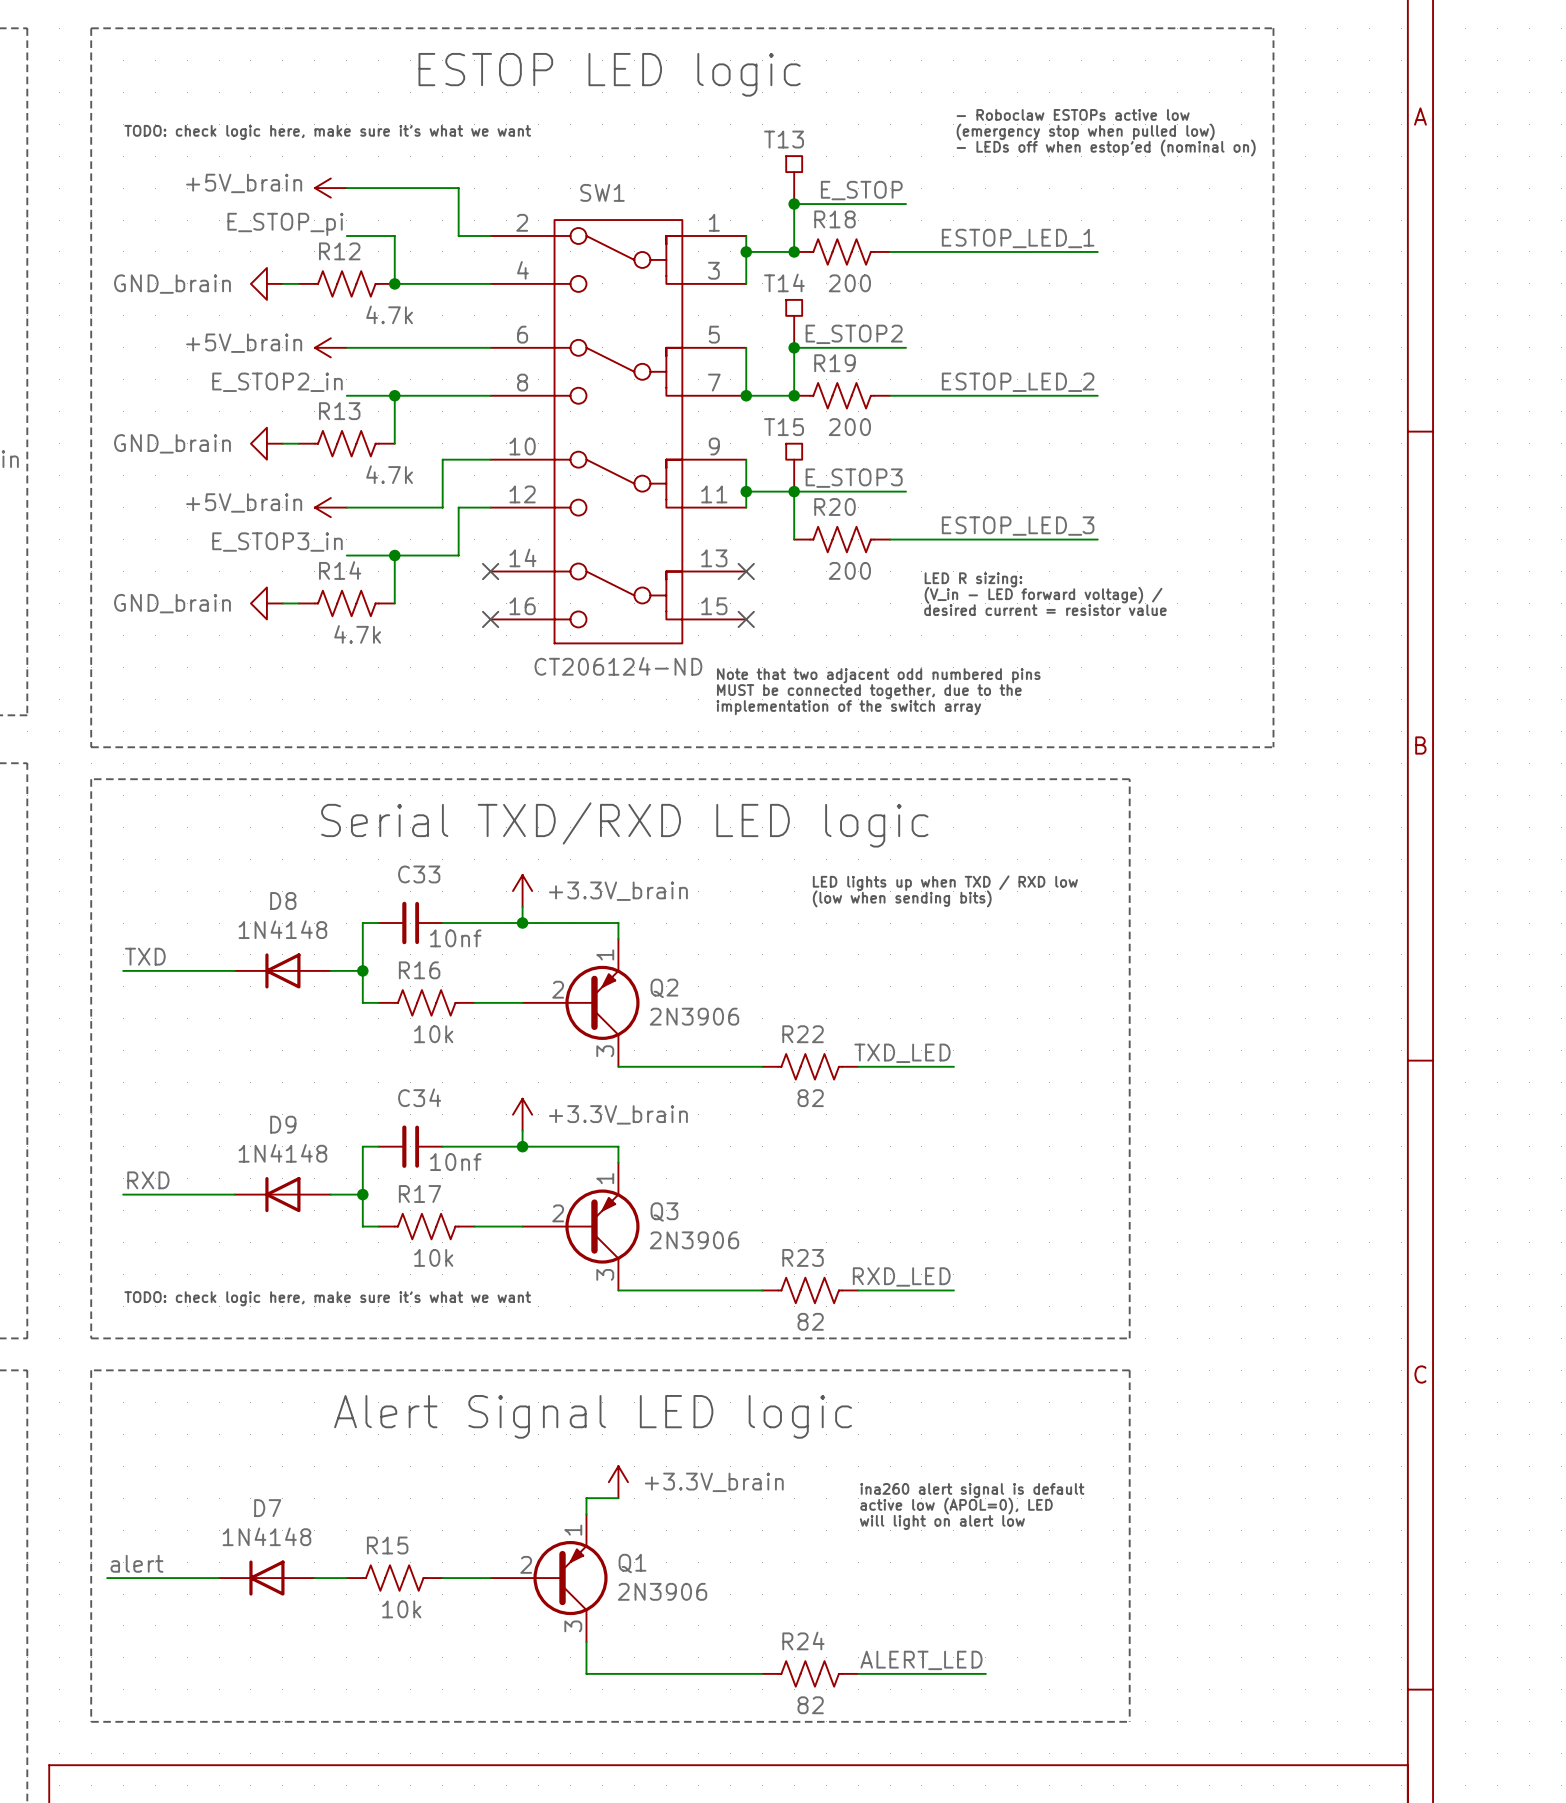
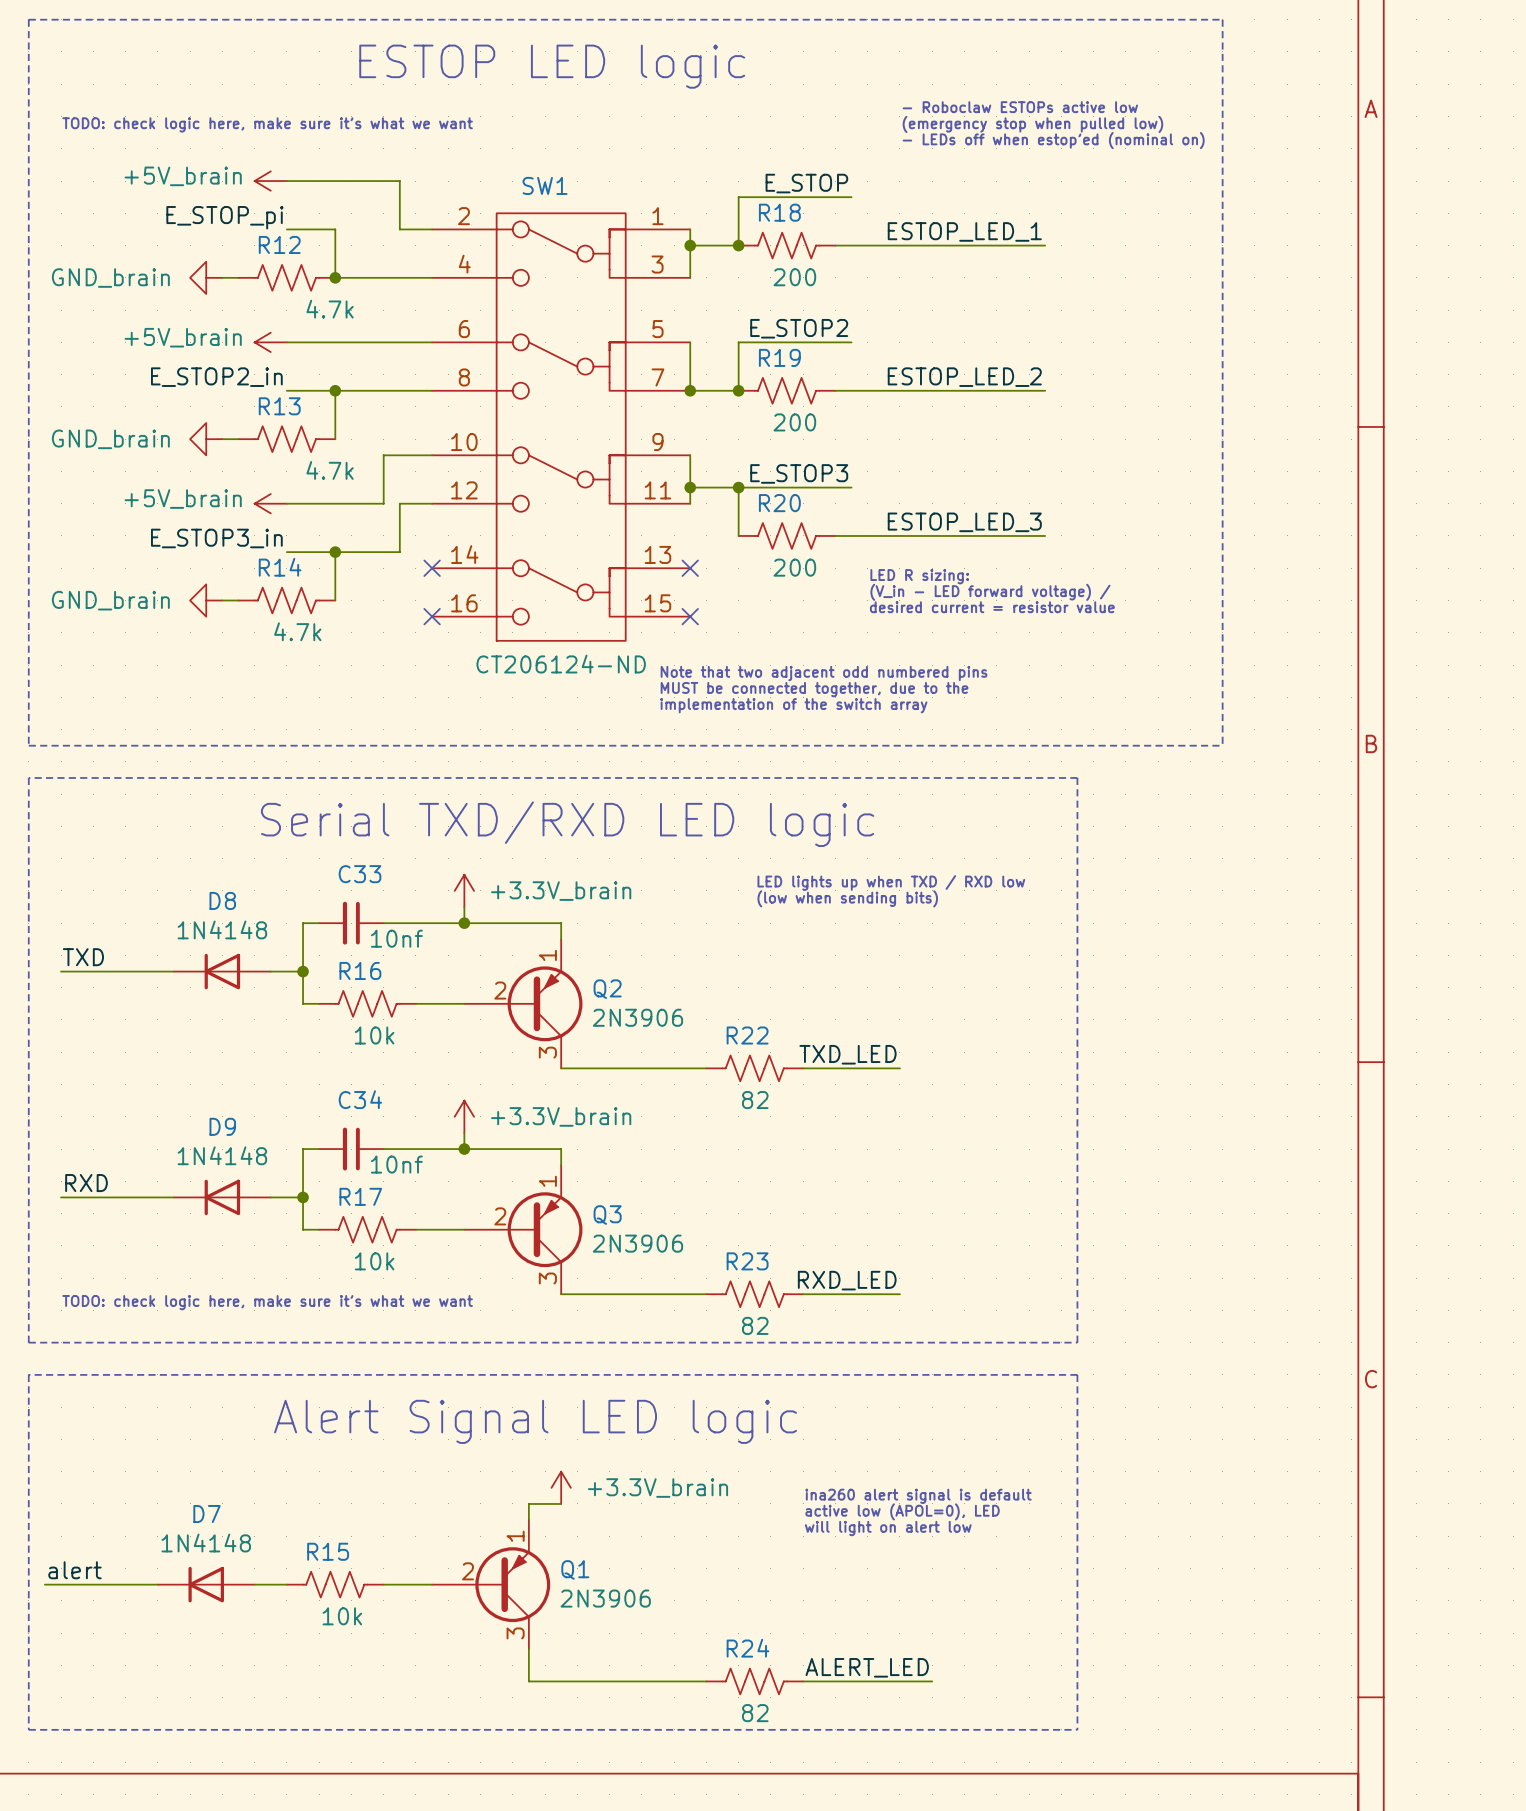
T13: (794, 180) -> none
junction: (794, 204) -> none
T14: (794, 323) -> none
junction: (794, 347) -> none
T15: (794, 467) -> none

